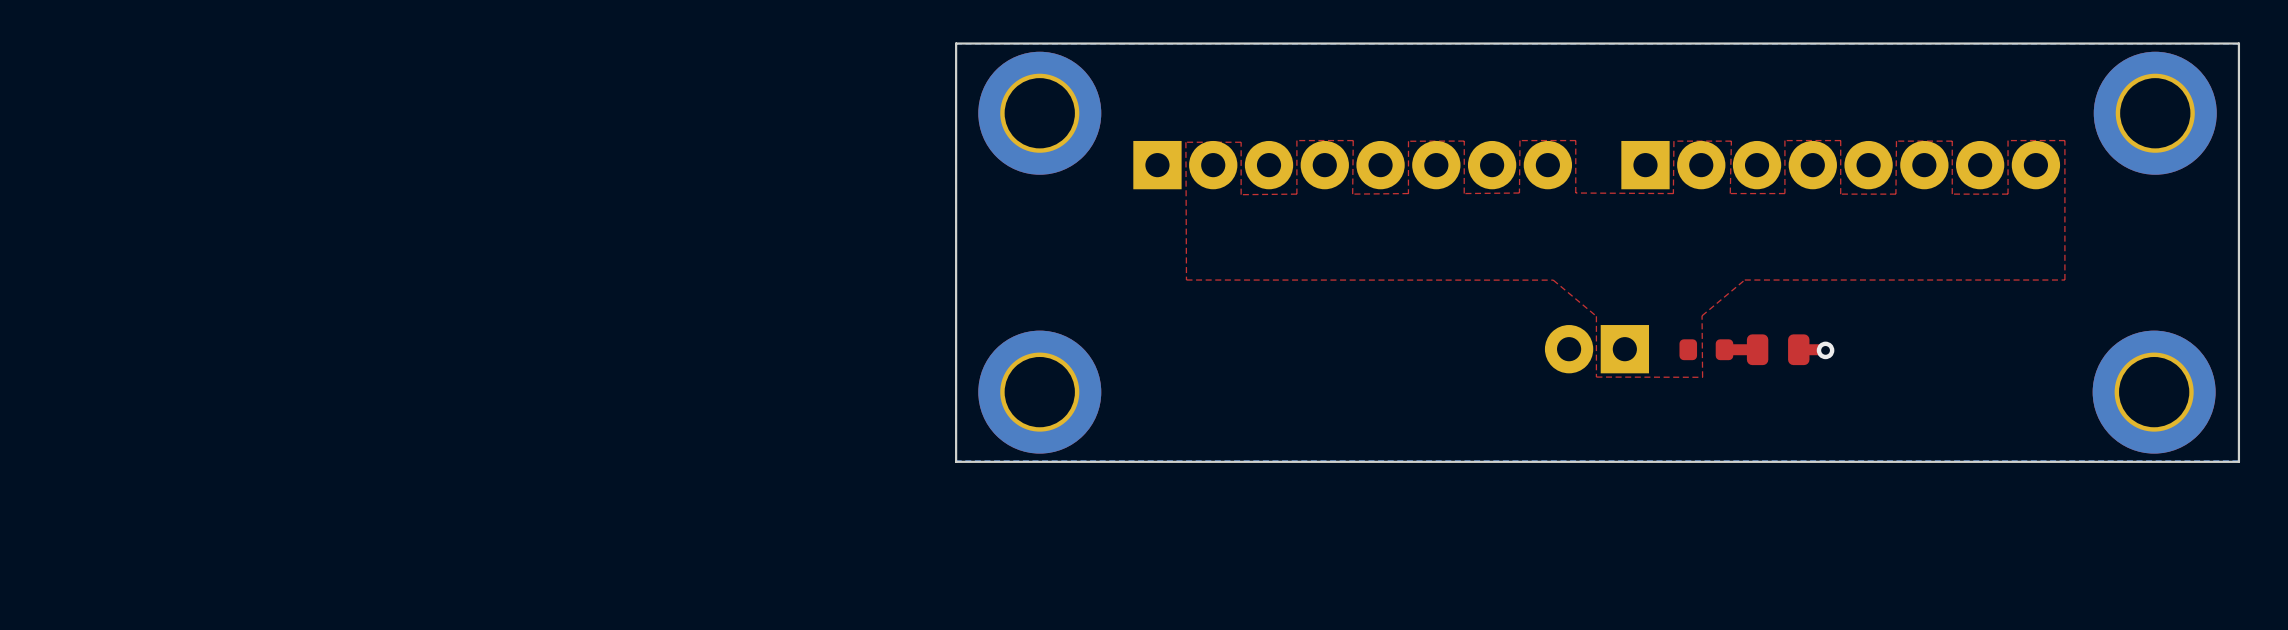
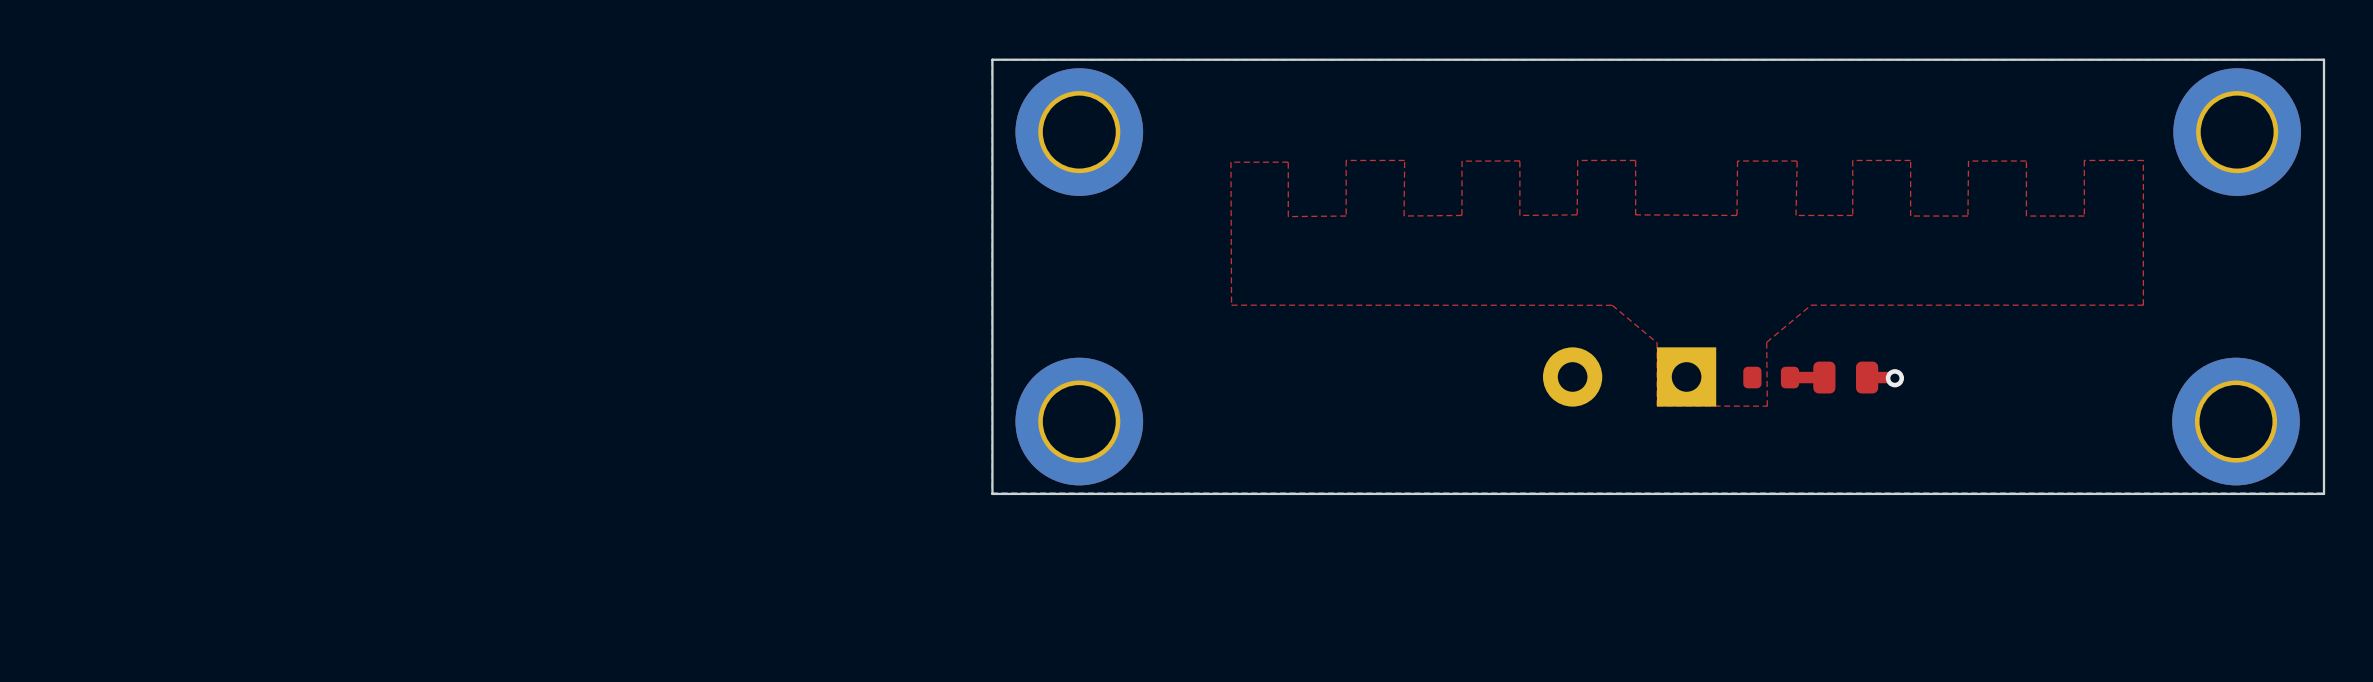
part: (1352, 165) -> none
part: (1840, 165) -> none
part: none -> (1629, 376)
part: (1596, 349) -> none

